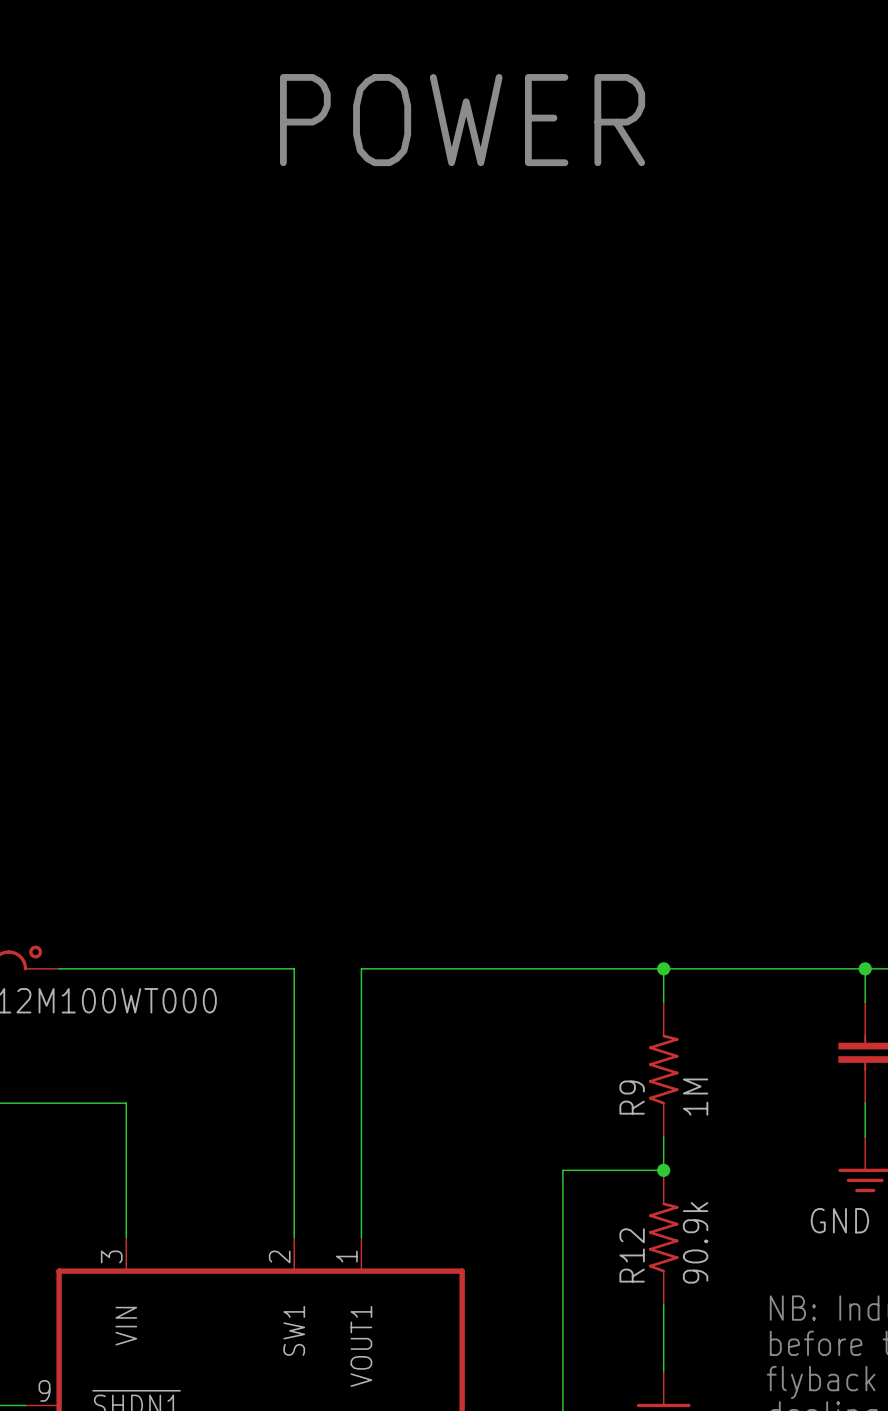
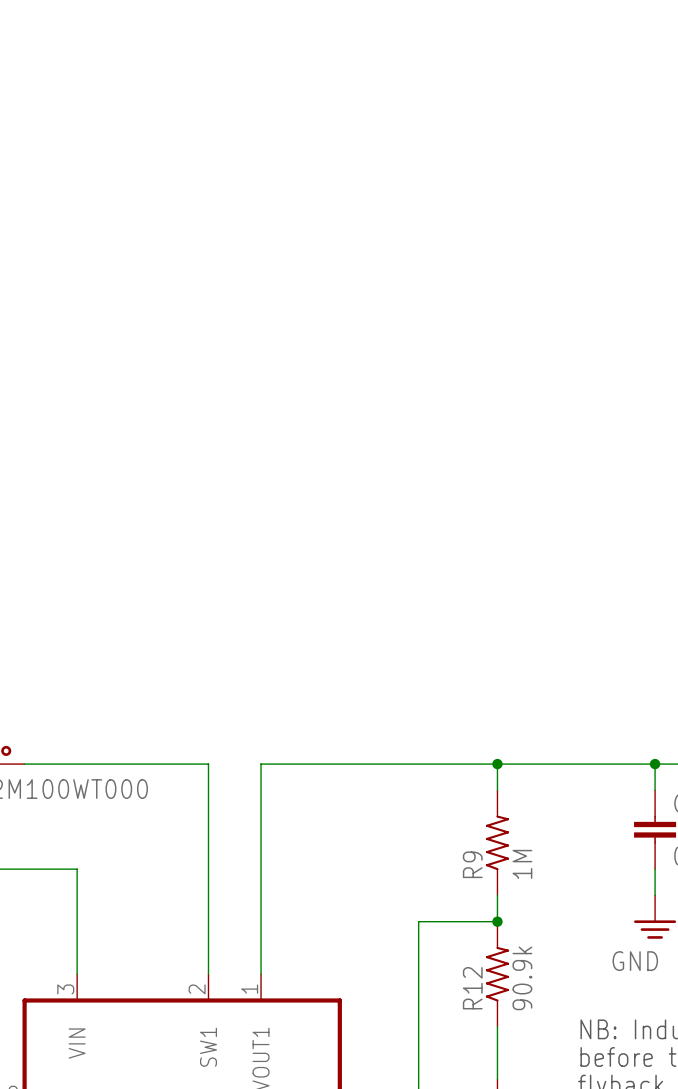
text: POWER (462, 120) -> none

